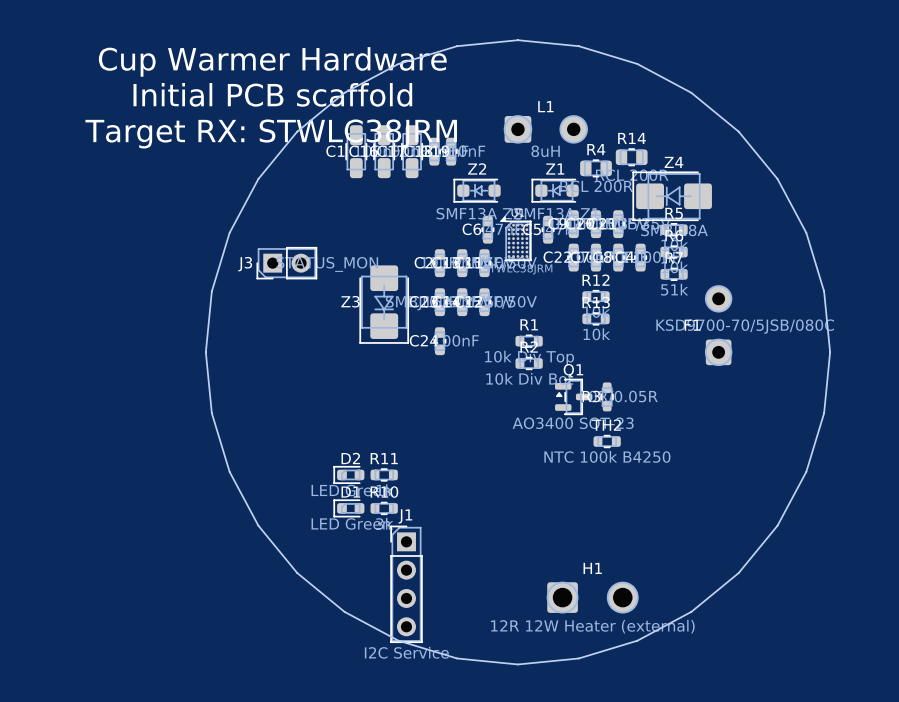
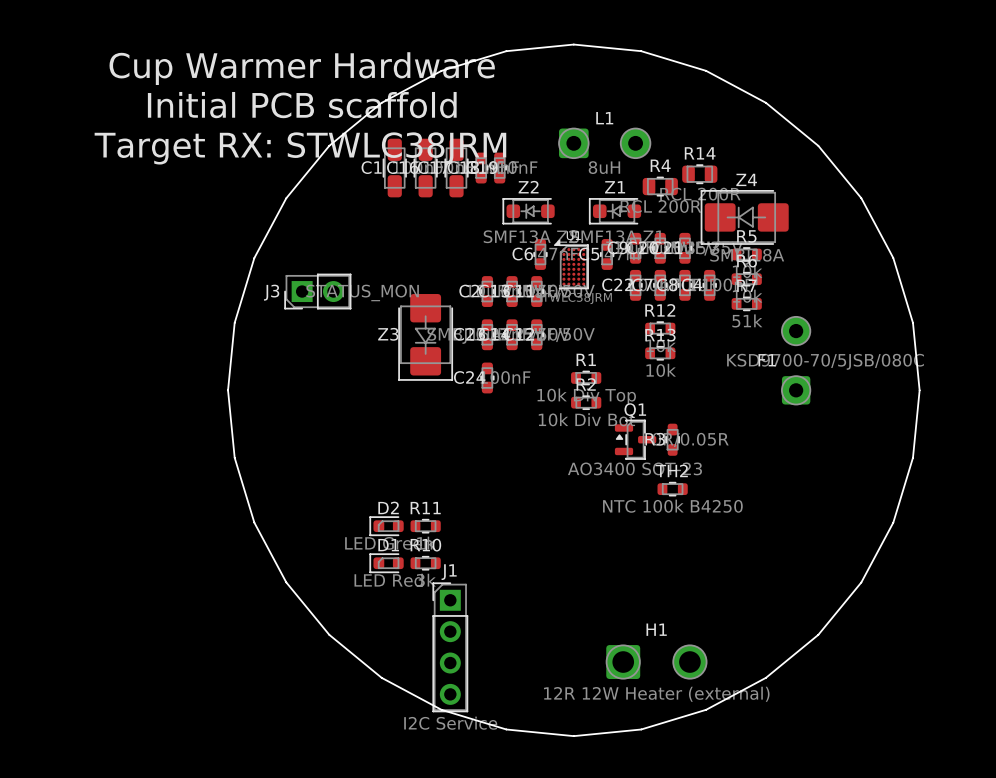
D1 value: LED Green (350, 523) -> LED Red (388, 580)

